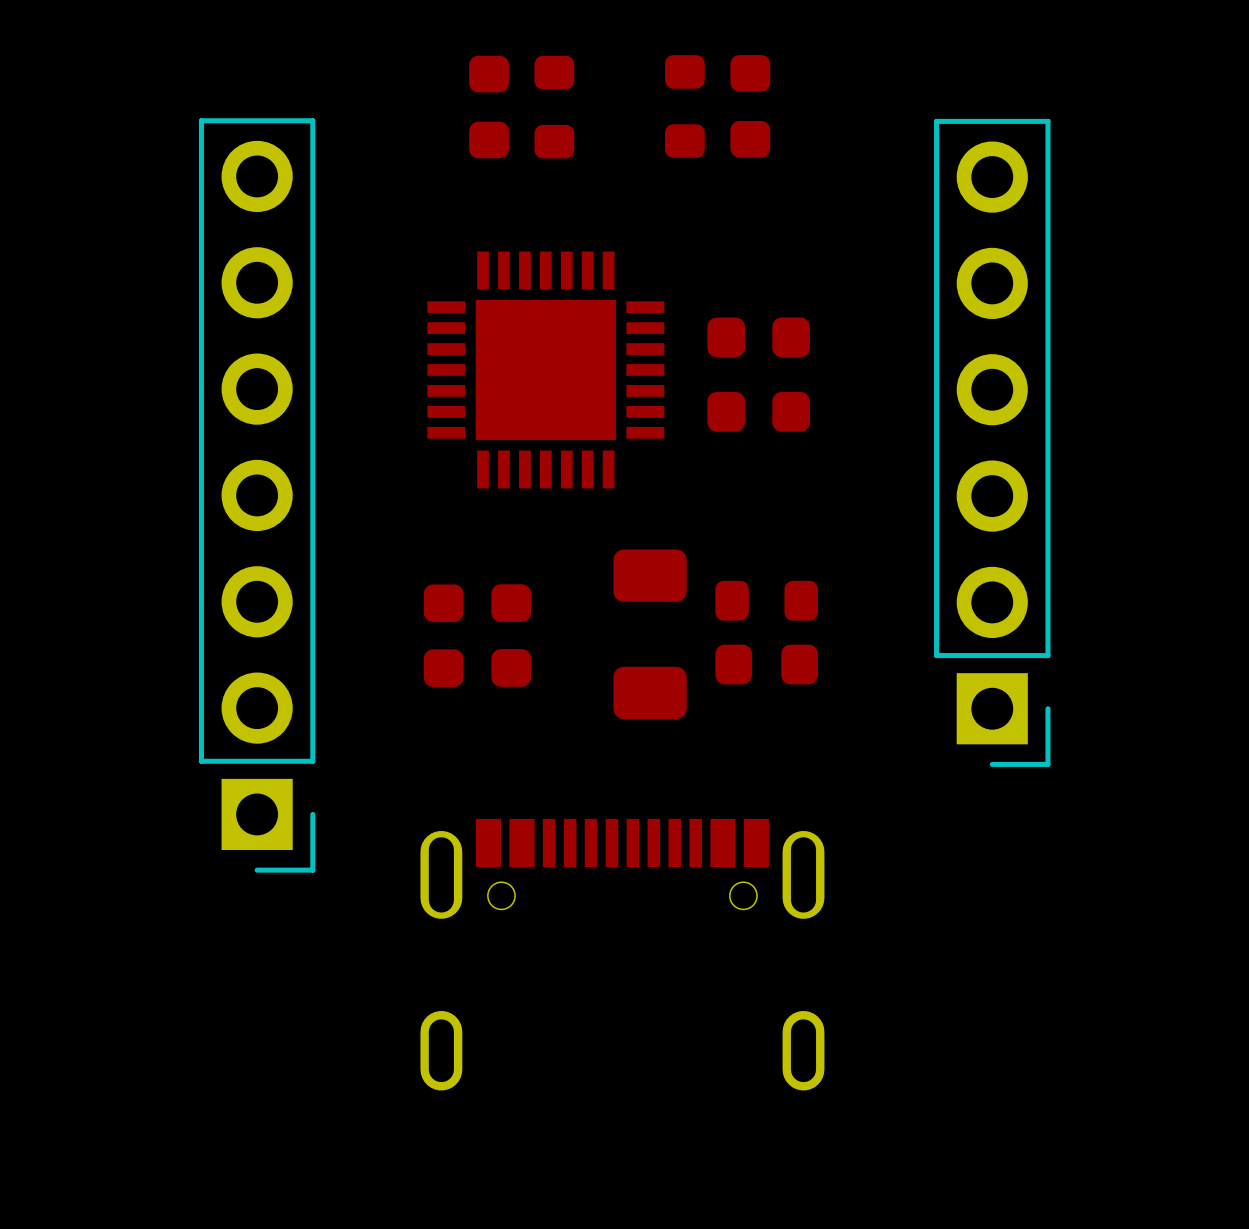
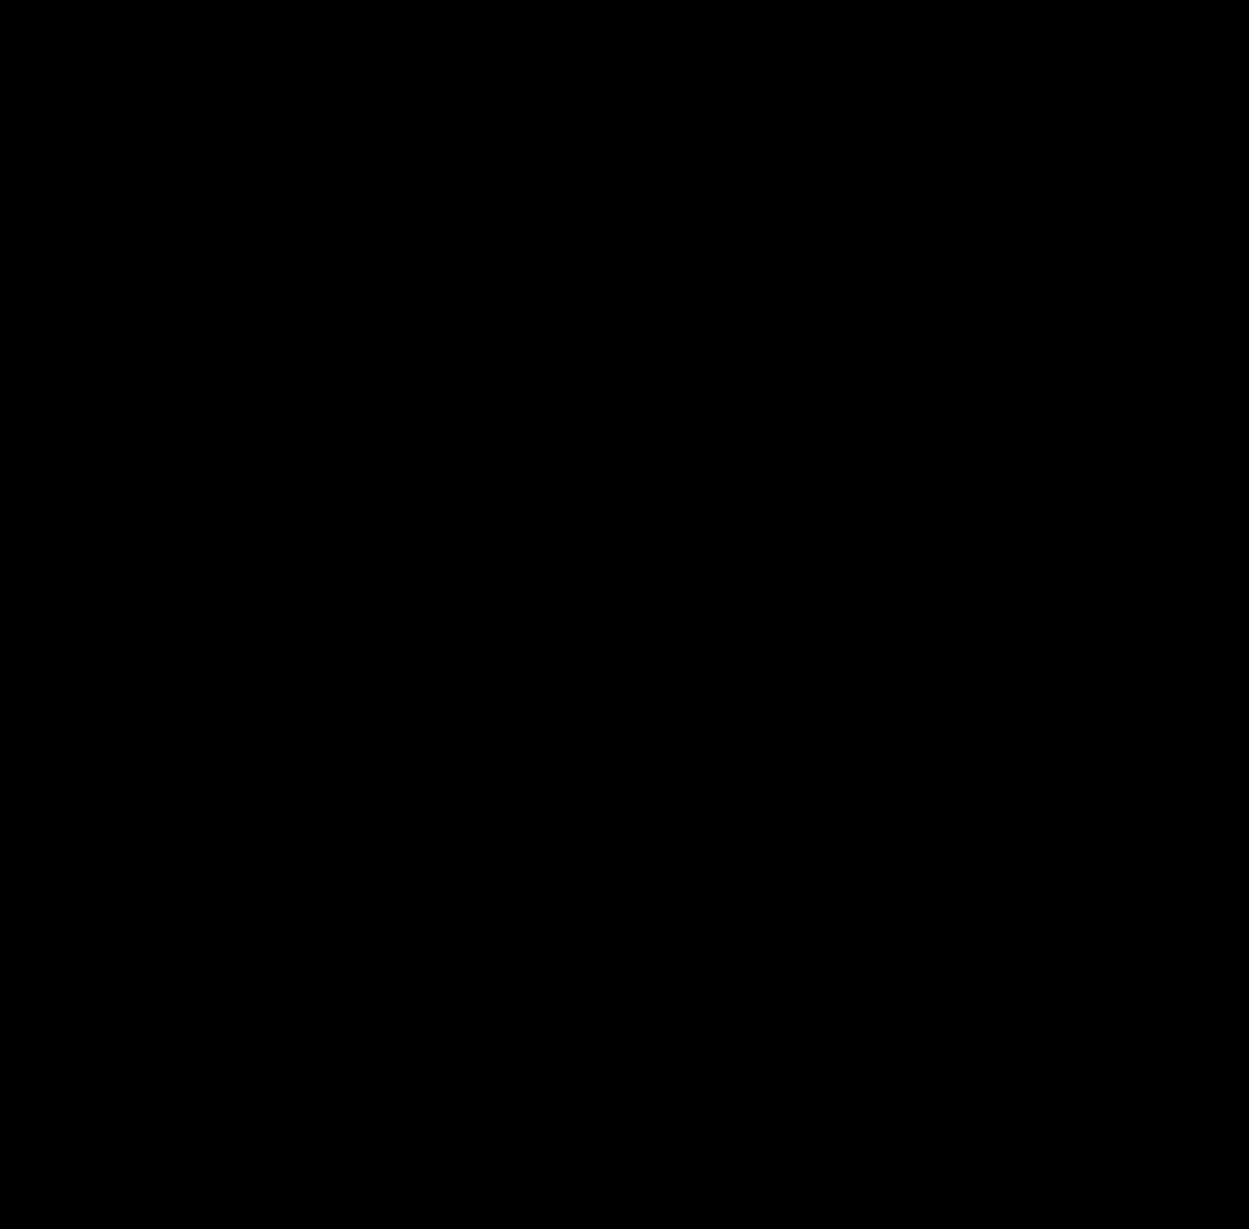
part: (684, 106) -> none
part: (750, 106) -> none
part: (489, 107) -> none
part: (554, 107) -> none
part: (758, 337) -> none
part: (545, 369) -> none
part: (758, 411) -> none
part: (992, 442) -> none
part: (257, 495) -> none
part: (766, 600) -> none
part: (650, 634) -> none
part: (443, 635) -> none
part: (511, 635) -> none
part: (766, 664) -> none
part: (622, 954) -> none

